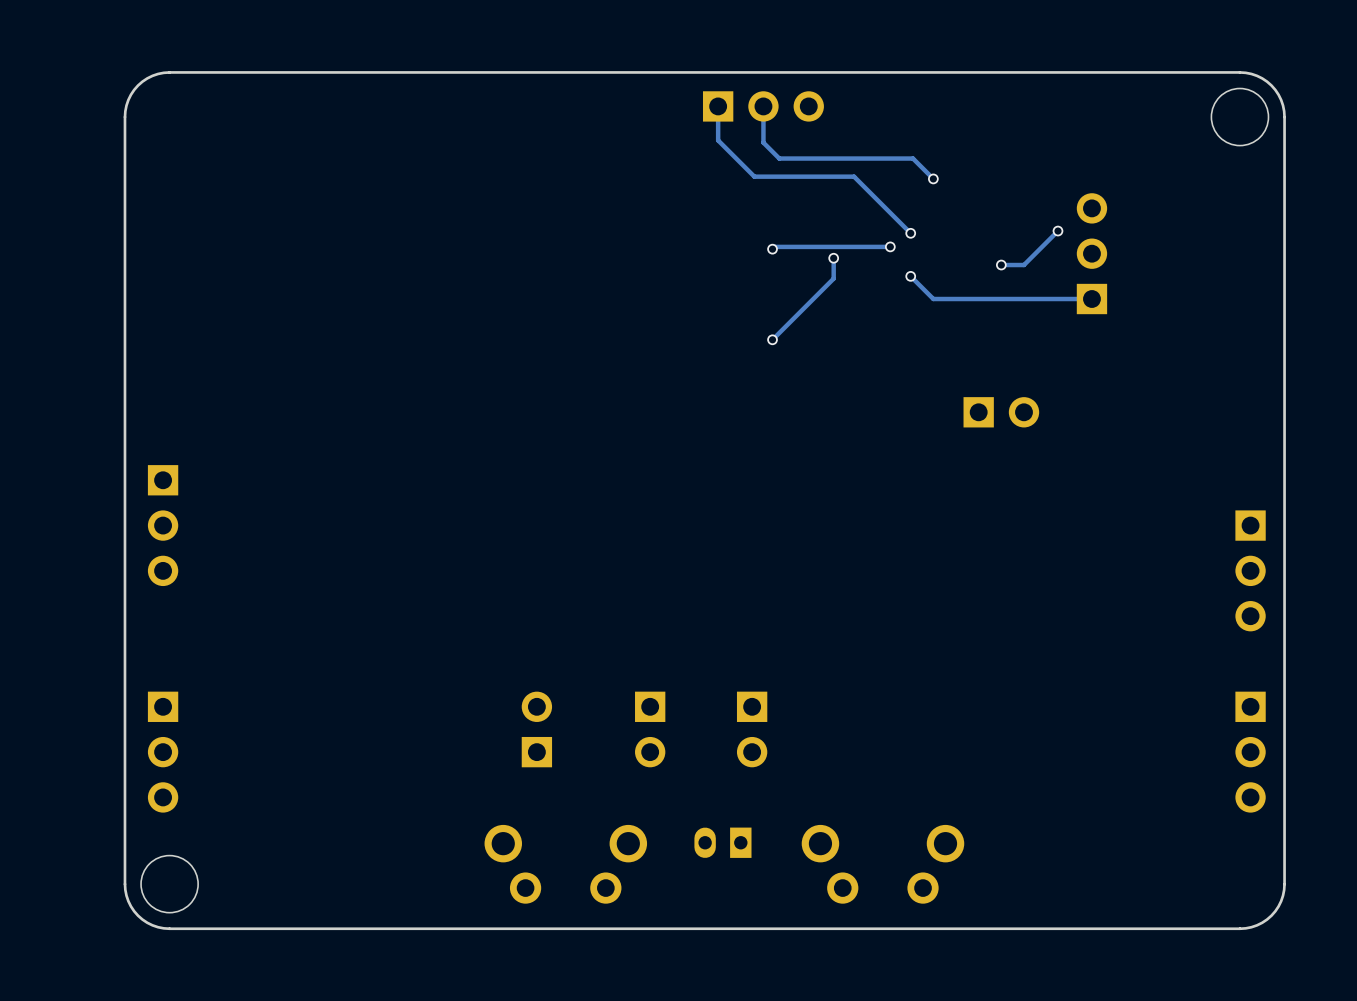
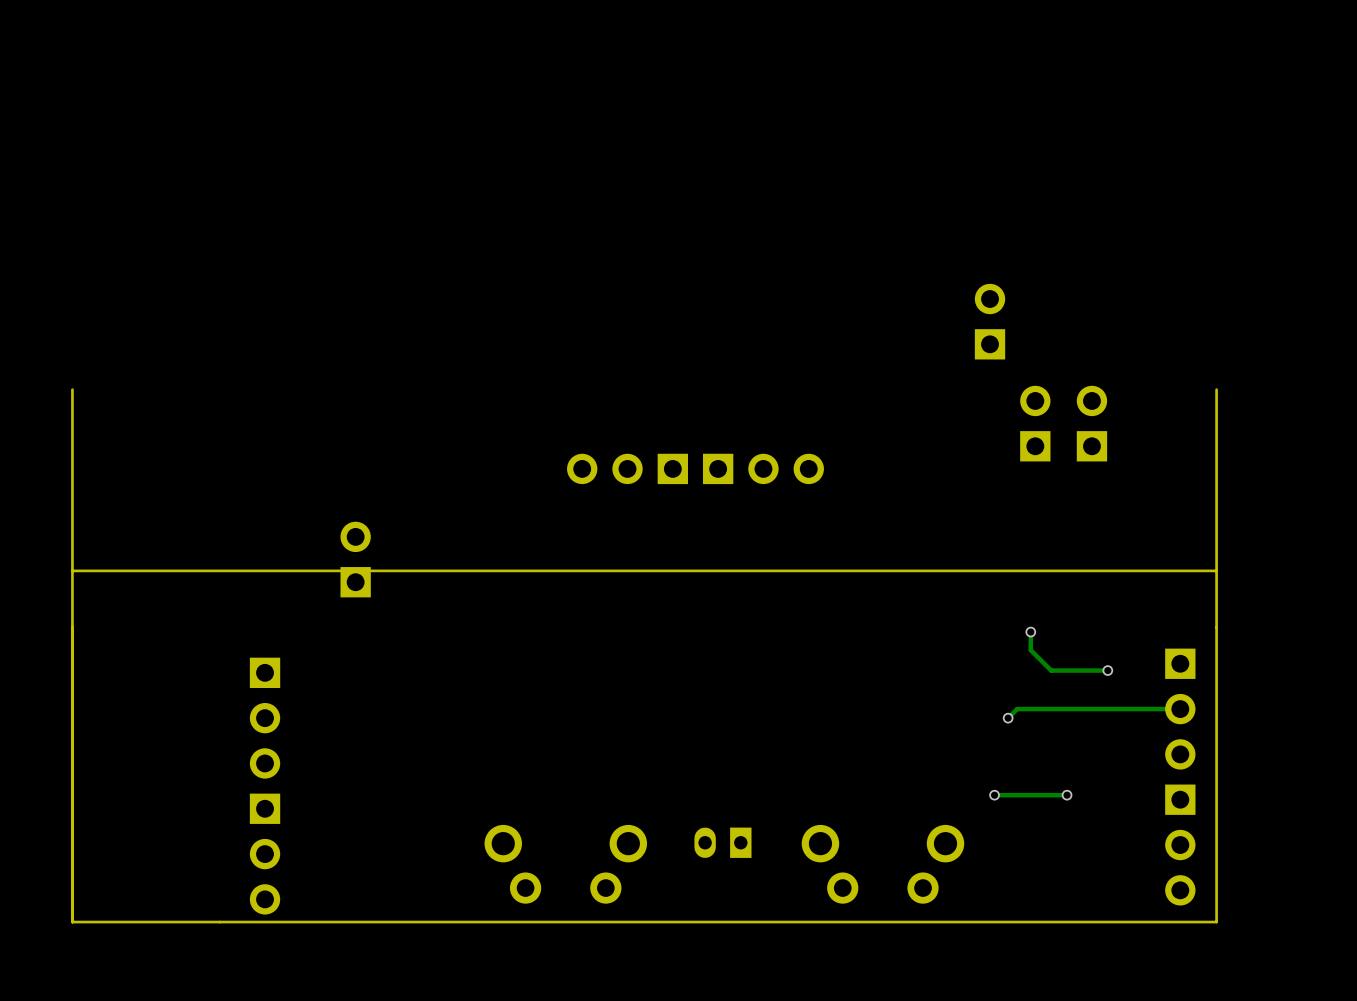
track: (718, 106) (718, 140) (754, 176) (854, 176) (910, 233) -> none
track: (763, 106) (763, 142) (779, 158) (912, 158) (933, 178) -> none
part: (763, 106) -> none
via: (933, 178) -> none
track: (1057, 231) (1024, 265) (1001, 265) -> none
via: (1057, 231) -> none
via: (910, 233) -> none
track: (890, 246) (774, 246) (772, 249) -> none
via: (890, 246) -> none
via: (772, 249) -> none
part: (1091, 253) -> none
track: (833, 258) (833, 278) (772, 339) -> none
via: (833, 258) -> none
via: (1001, 265) -> none
track: (910, 276) (933, 299) (1091, 299) -> none
via: (910, 276) -> none
part: none -> (990, 321)
via: (772, 339) -> none
board edge: none -> (1216, 389) (1216, 922) (72, 922) (72, 389)
part rotation: 0° (1001, 412) -> 90° counterclockwise (1035, 423)
part: none -> (1091, 423)
part: none -> (627, 468)
part: none -> (763, 468)
part: (704, 500) -> none
part: (163, 525) -> none
part: none -> (355, 559)
board edge: none -> (1216, 570) (72, 570)
part: (1250, 570) -> none
track: none -> (1030, 632) (1030, 650) (1051, 670) (1107, 670)
via: none -> (1030, 632)
via: none -> (1107, 670)
track: none -> (1180, 709) (1017, 709) (1008, 718)
part: none -> (1180, 709)
part: none -> (265, 718)
via: none -> (1008, 718)
part: (536, 729) -> none
part: (650, 729) -> none
part: (752, 729) -> none
part: (163, 752) -> none
part: (1250, 752) -> none
via: none -> (994, 795)
track: none -> (1067, 795) (994, 795)
via: none -> (1067, 795)
part: none -> (1180, 845)
part: none -> (265, 854)

